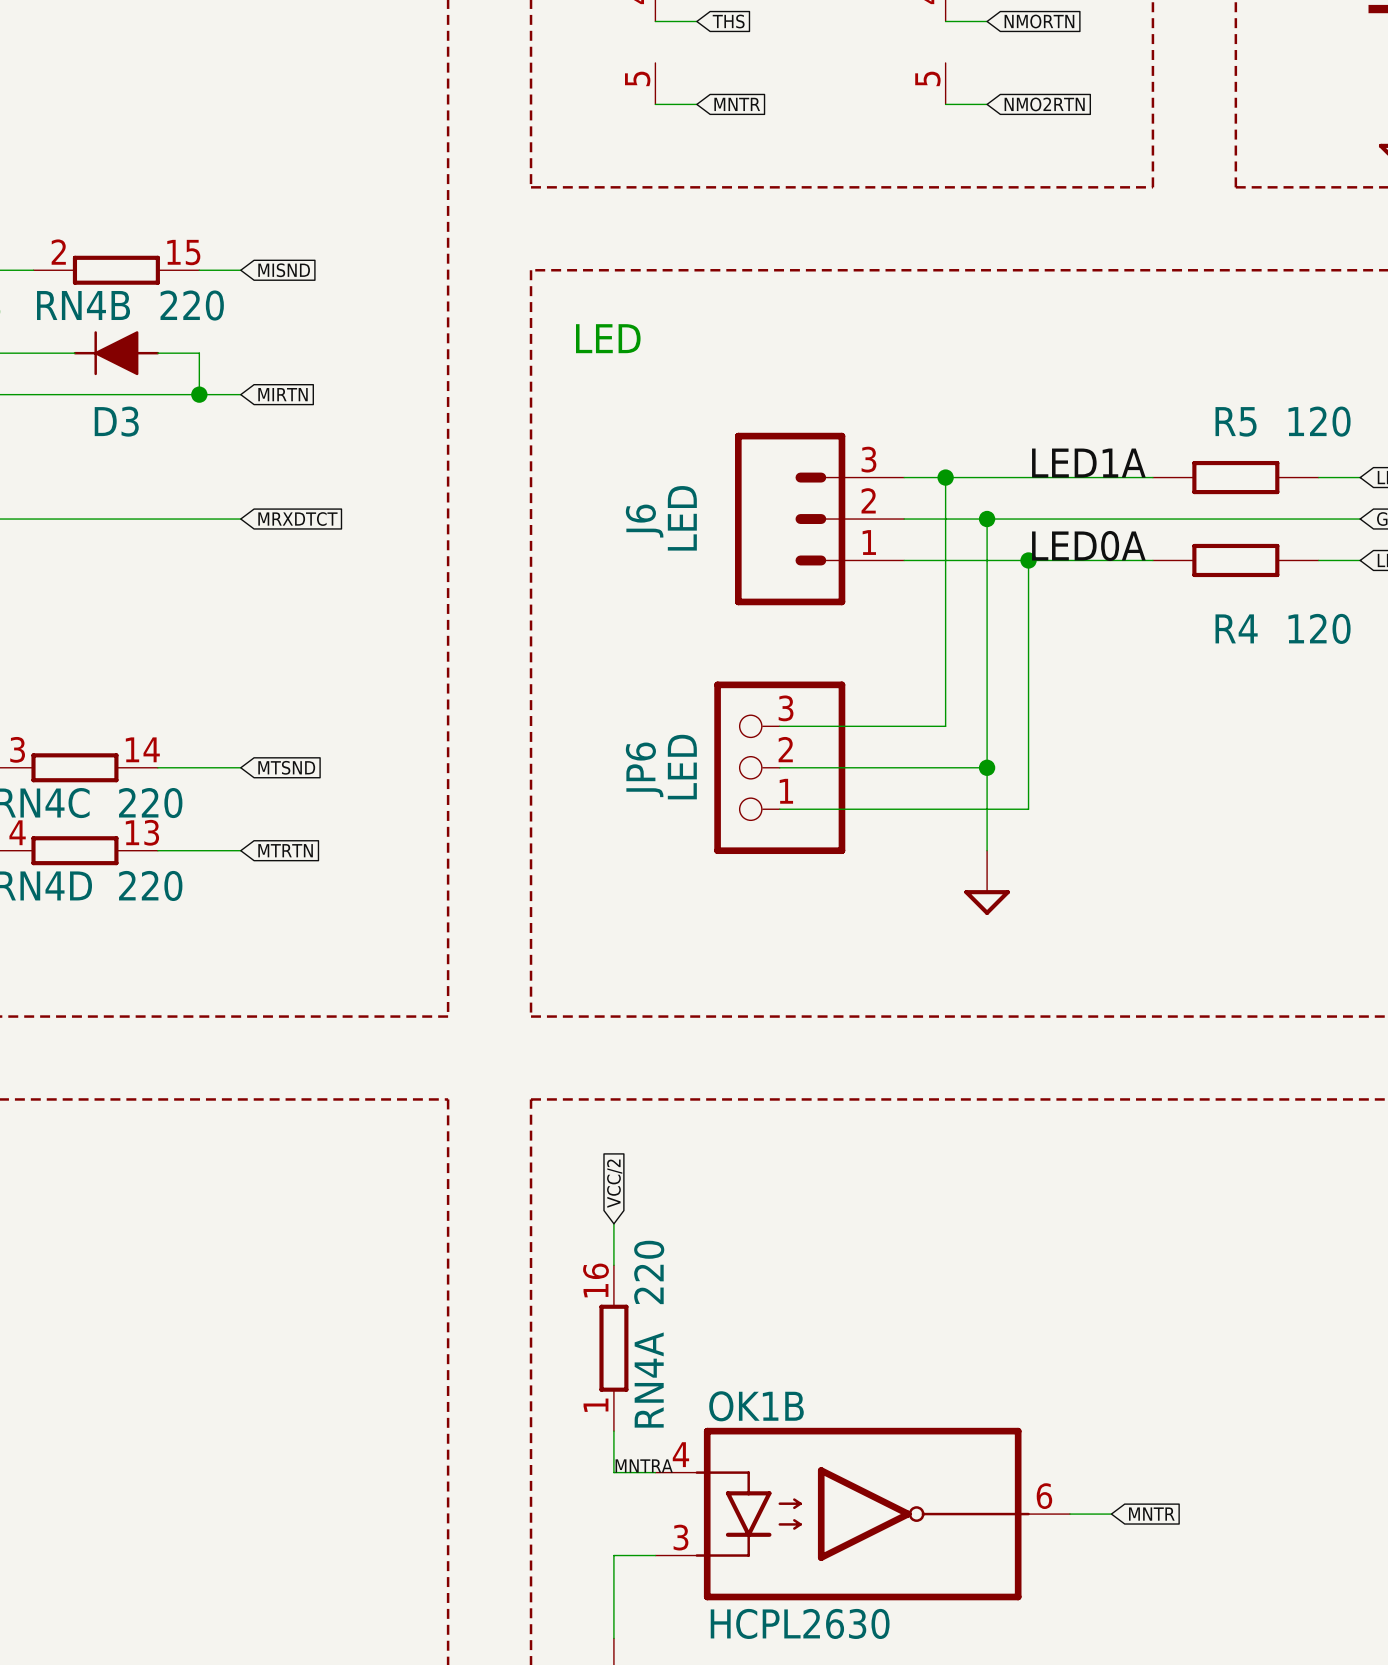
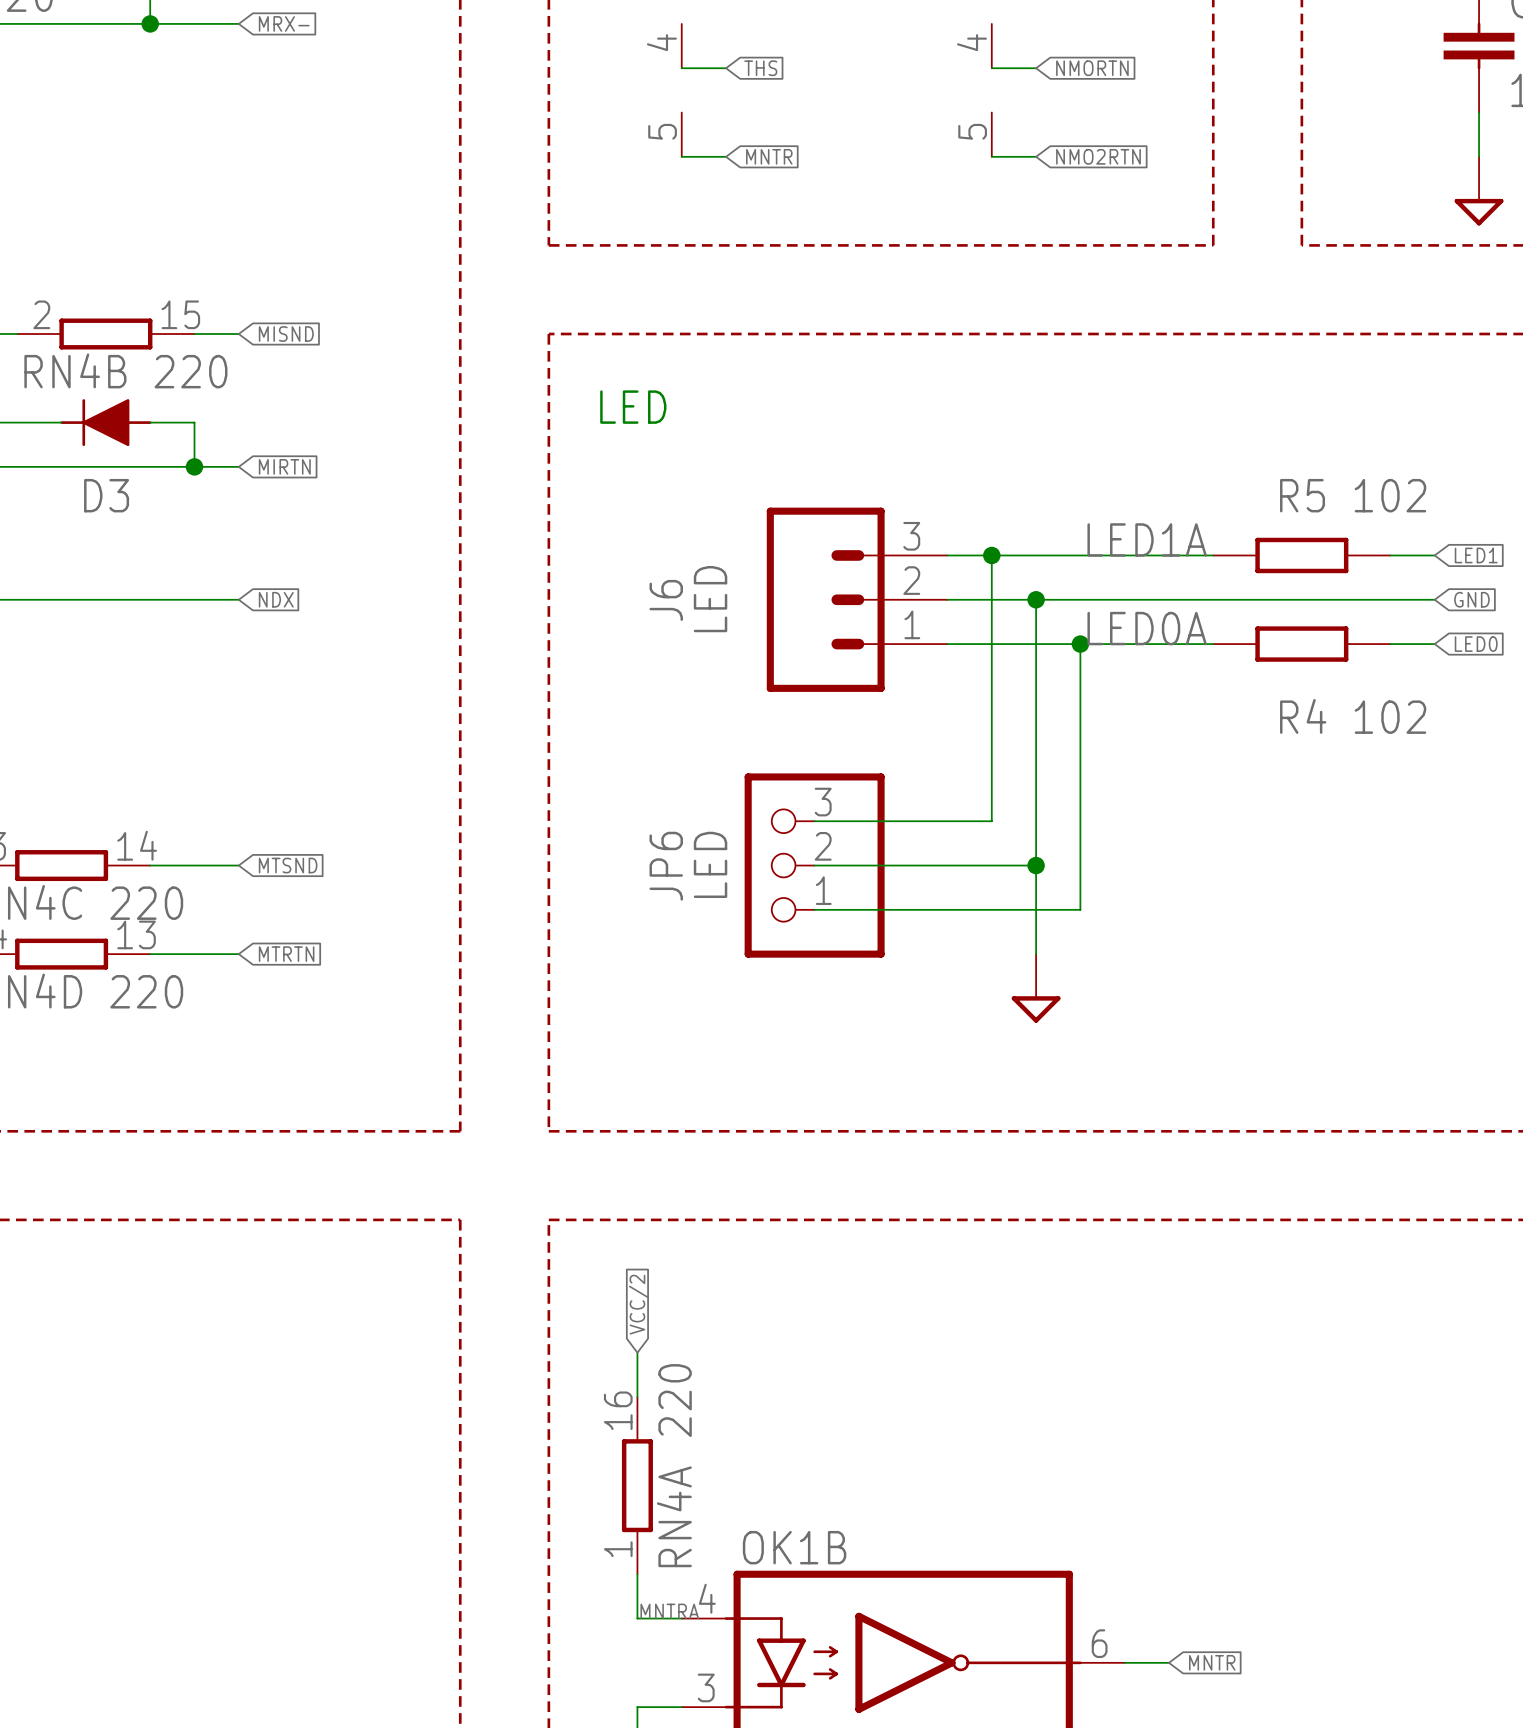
R5 value: 120 (1319, 421) -> 102 (1390, 495)
global label: MRXDTCT (297, 519) -> NDX (276, 599)
R4 value: 120 (1319, 628) -> 102 (1390, 717)

